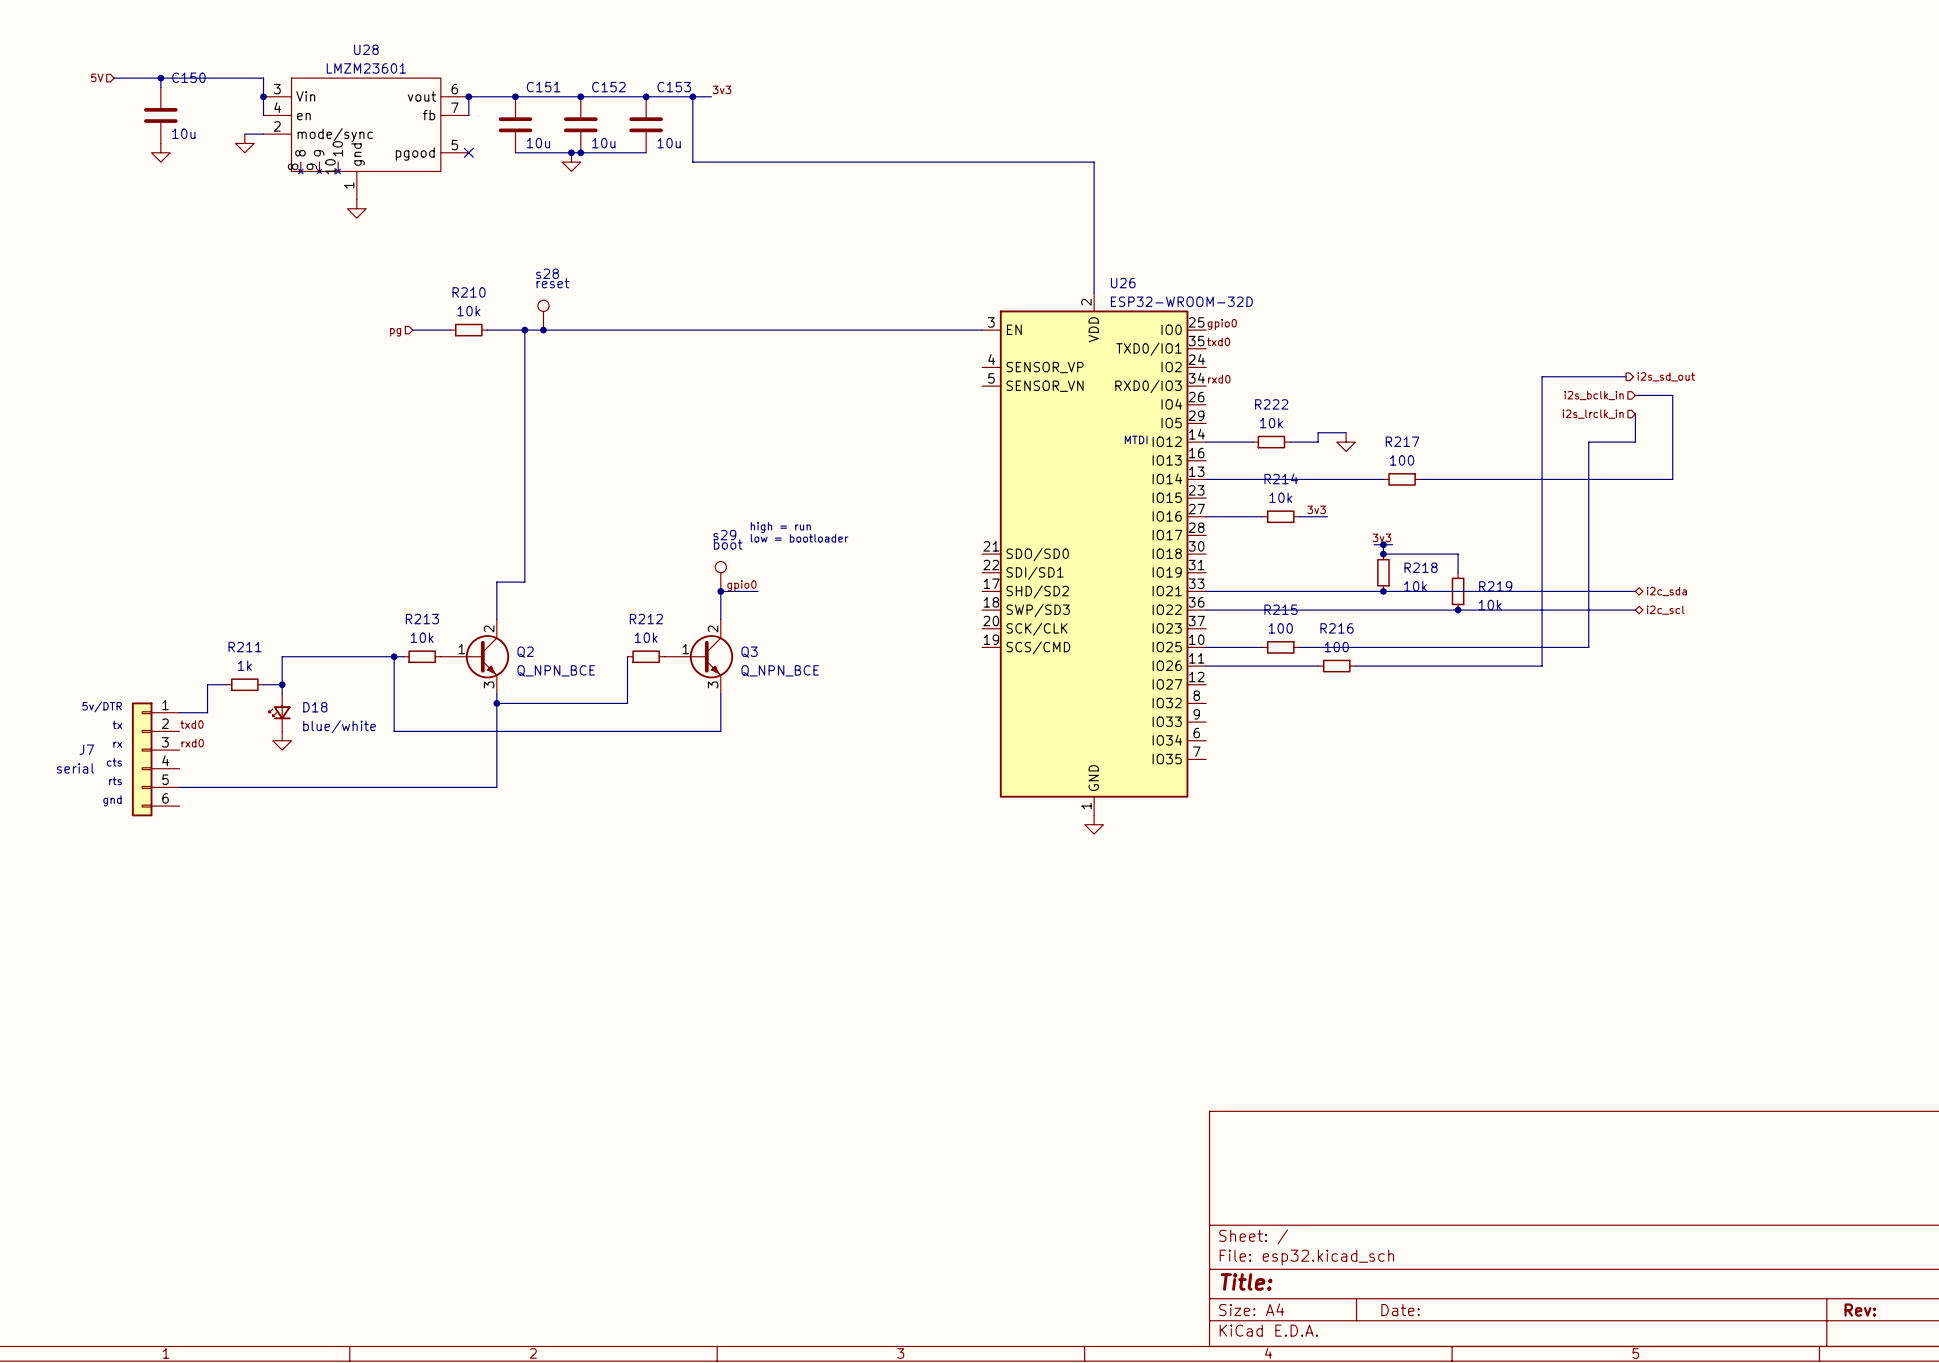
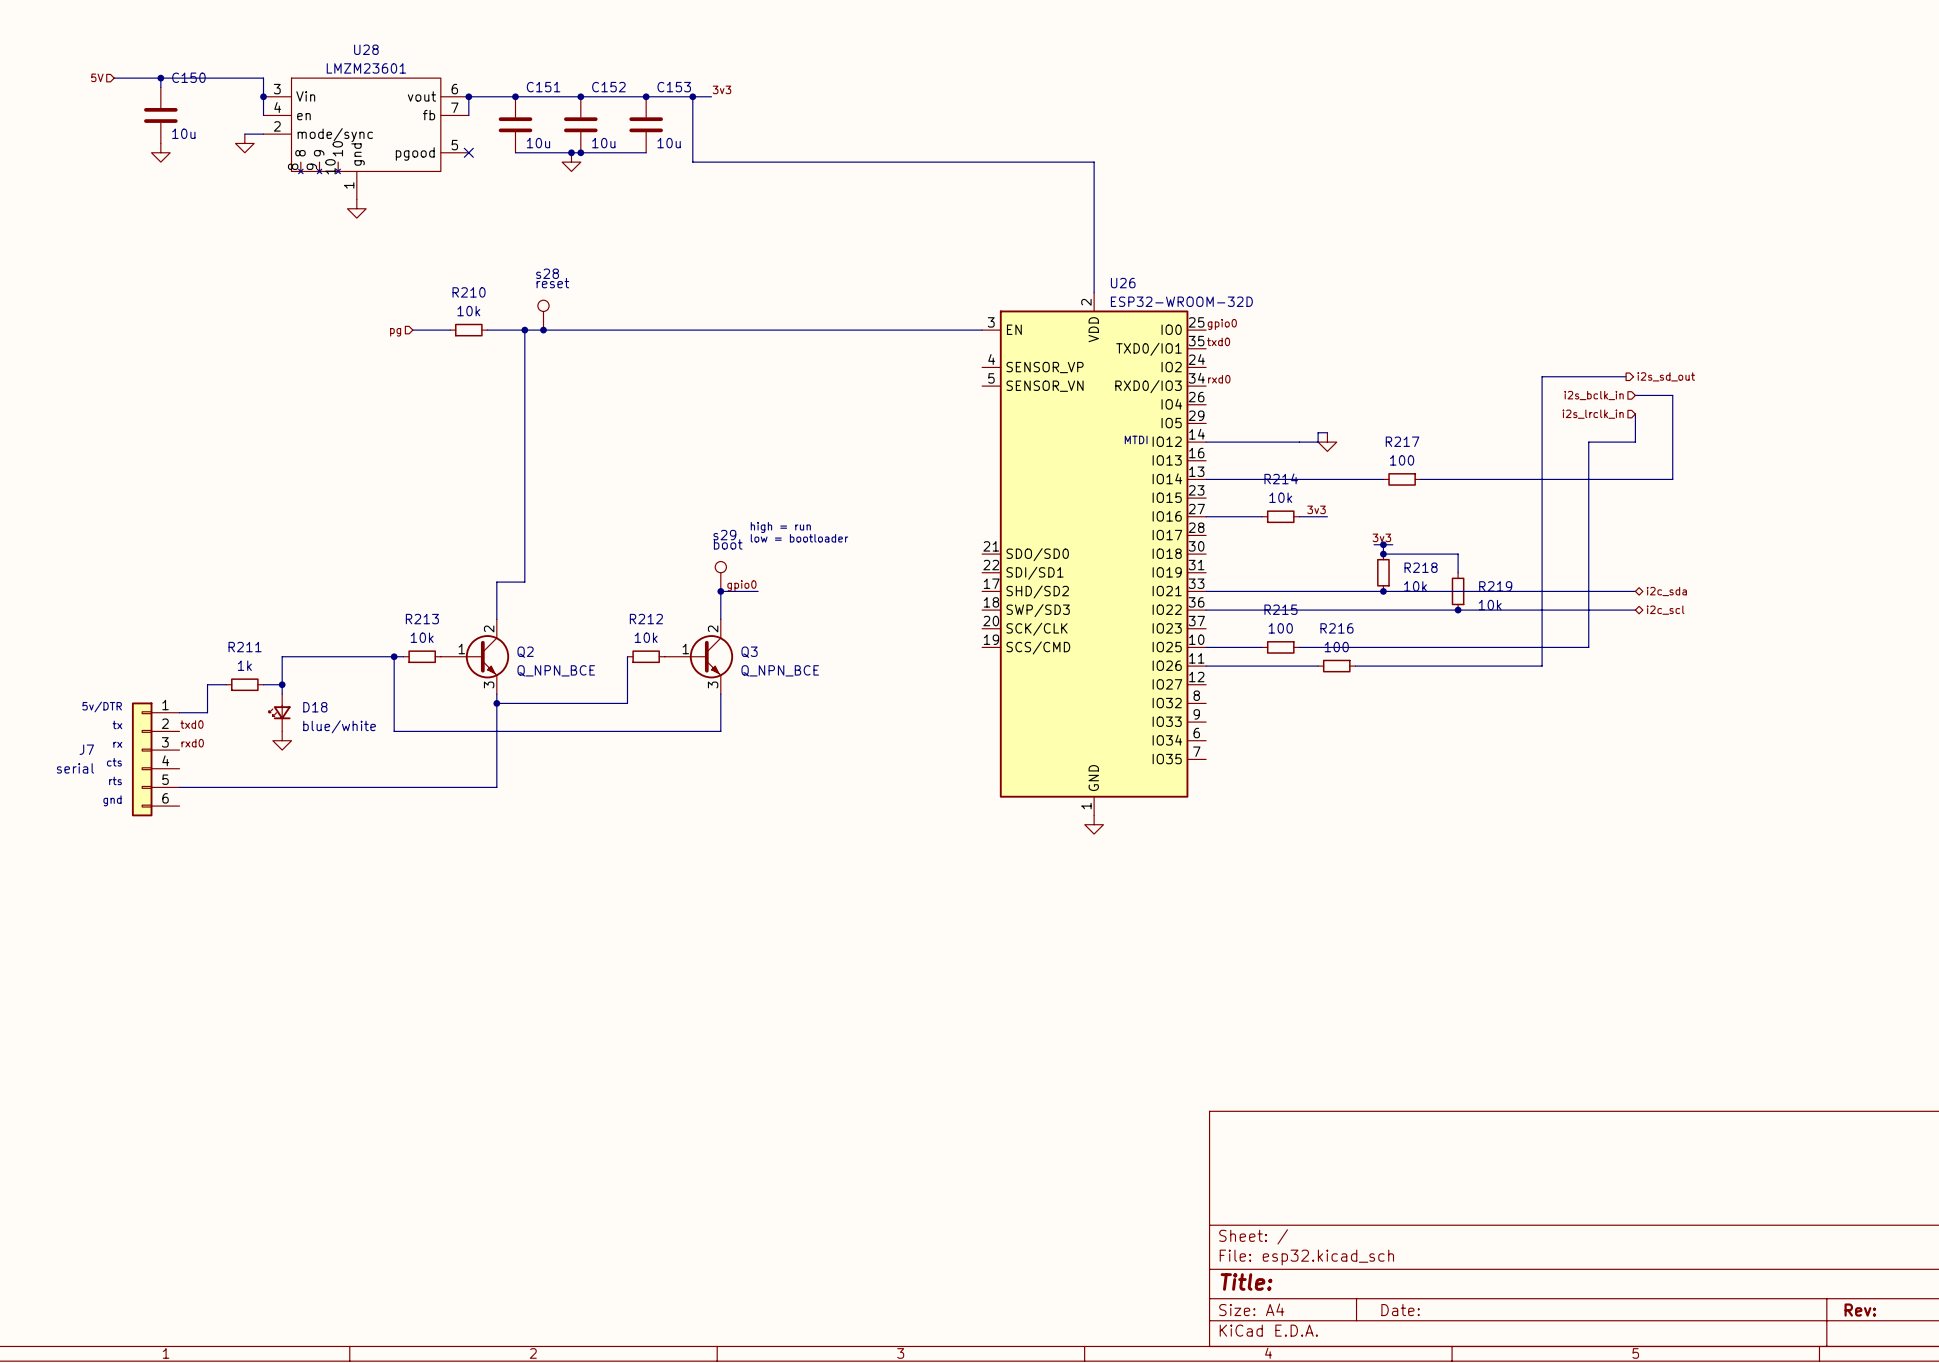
wire: (1327, 432) (1346, 432) -> none
wire: none -> (1252, 442) (1290, 442)
R222: 10k (1271, 442) -> none
power symbol position: (1346, 442) -> (1327, 442)

